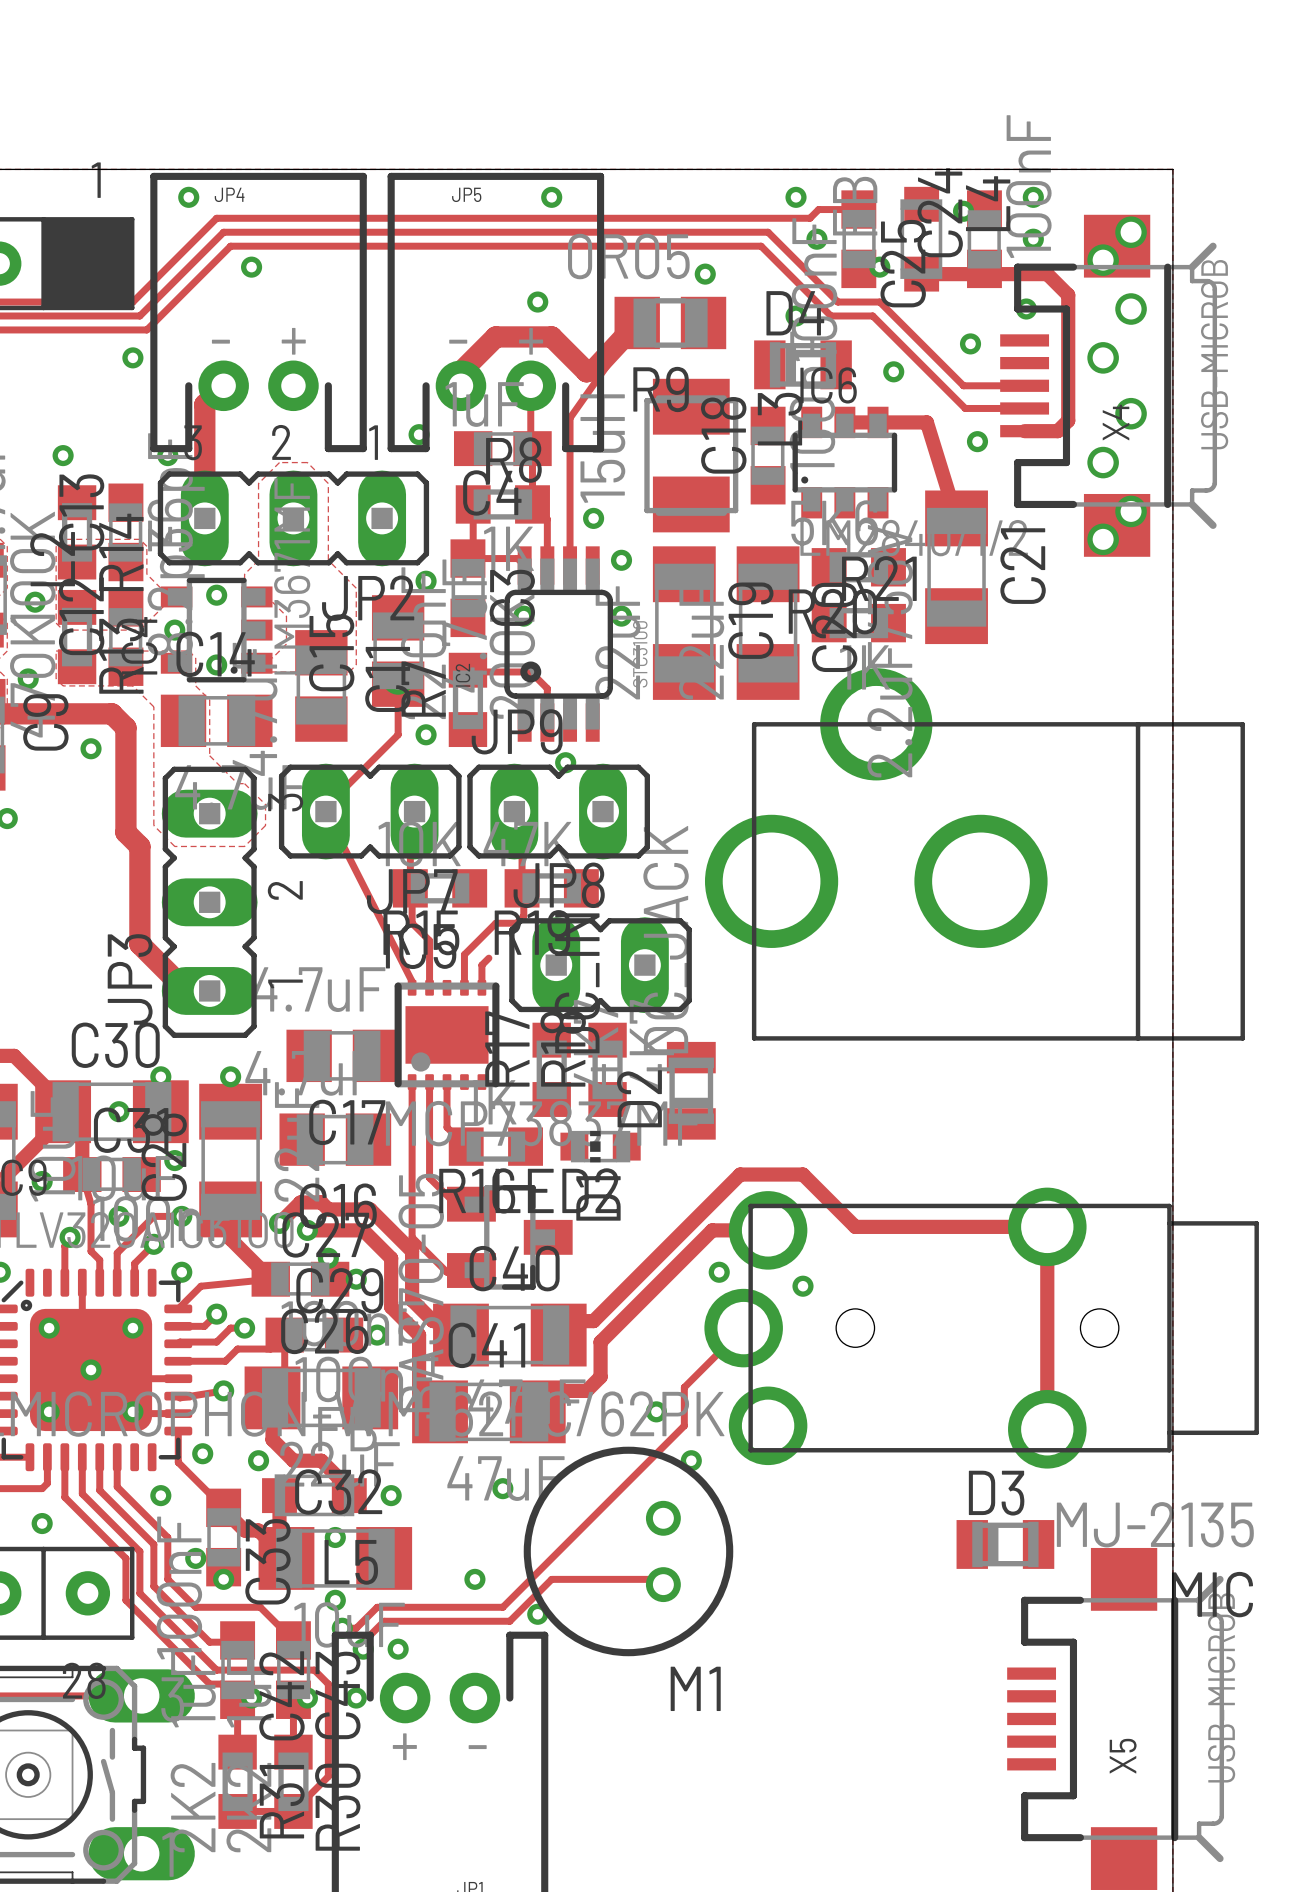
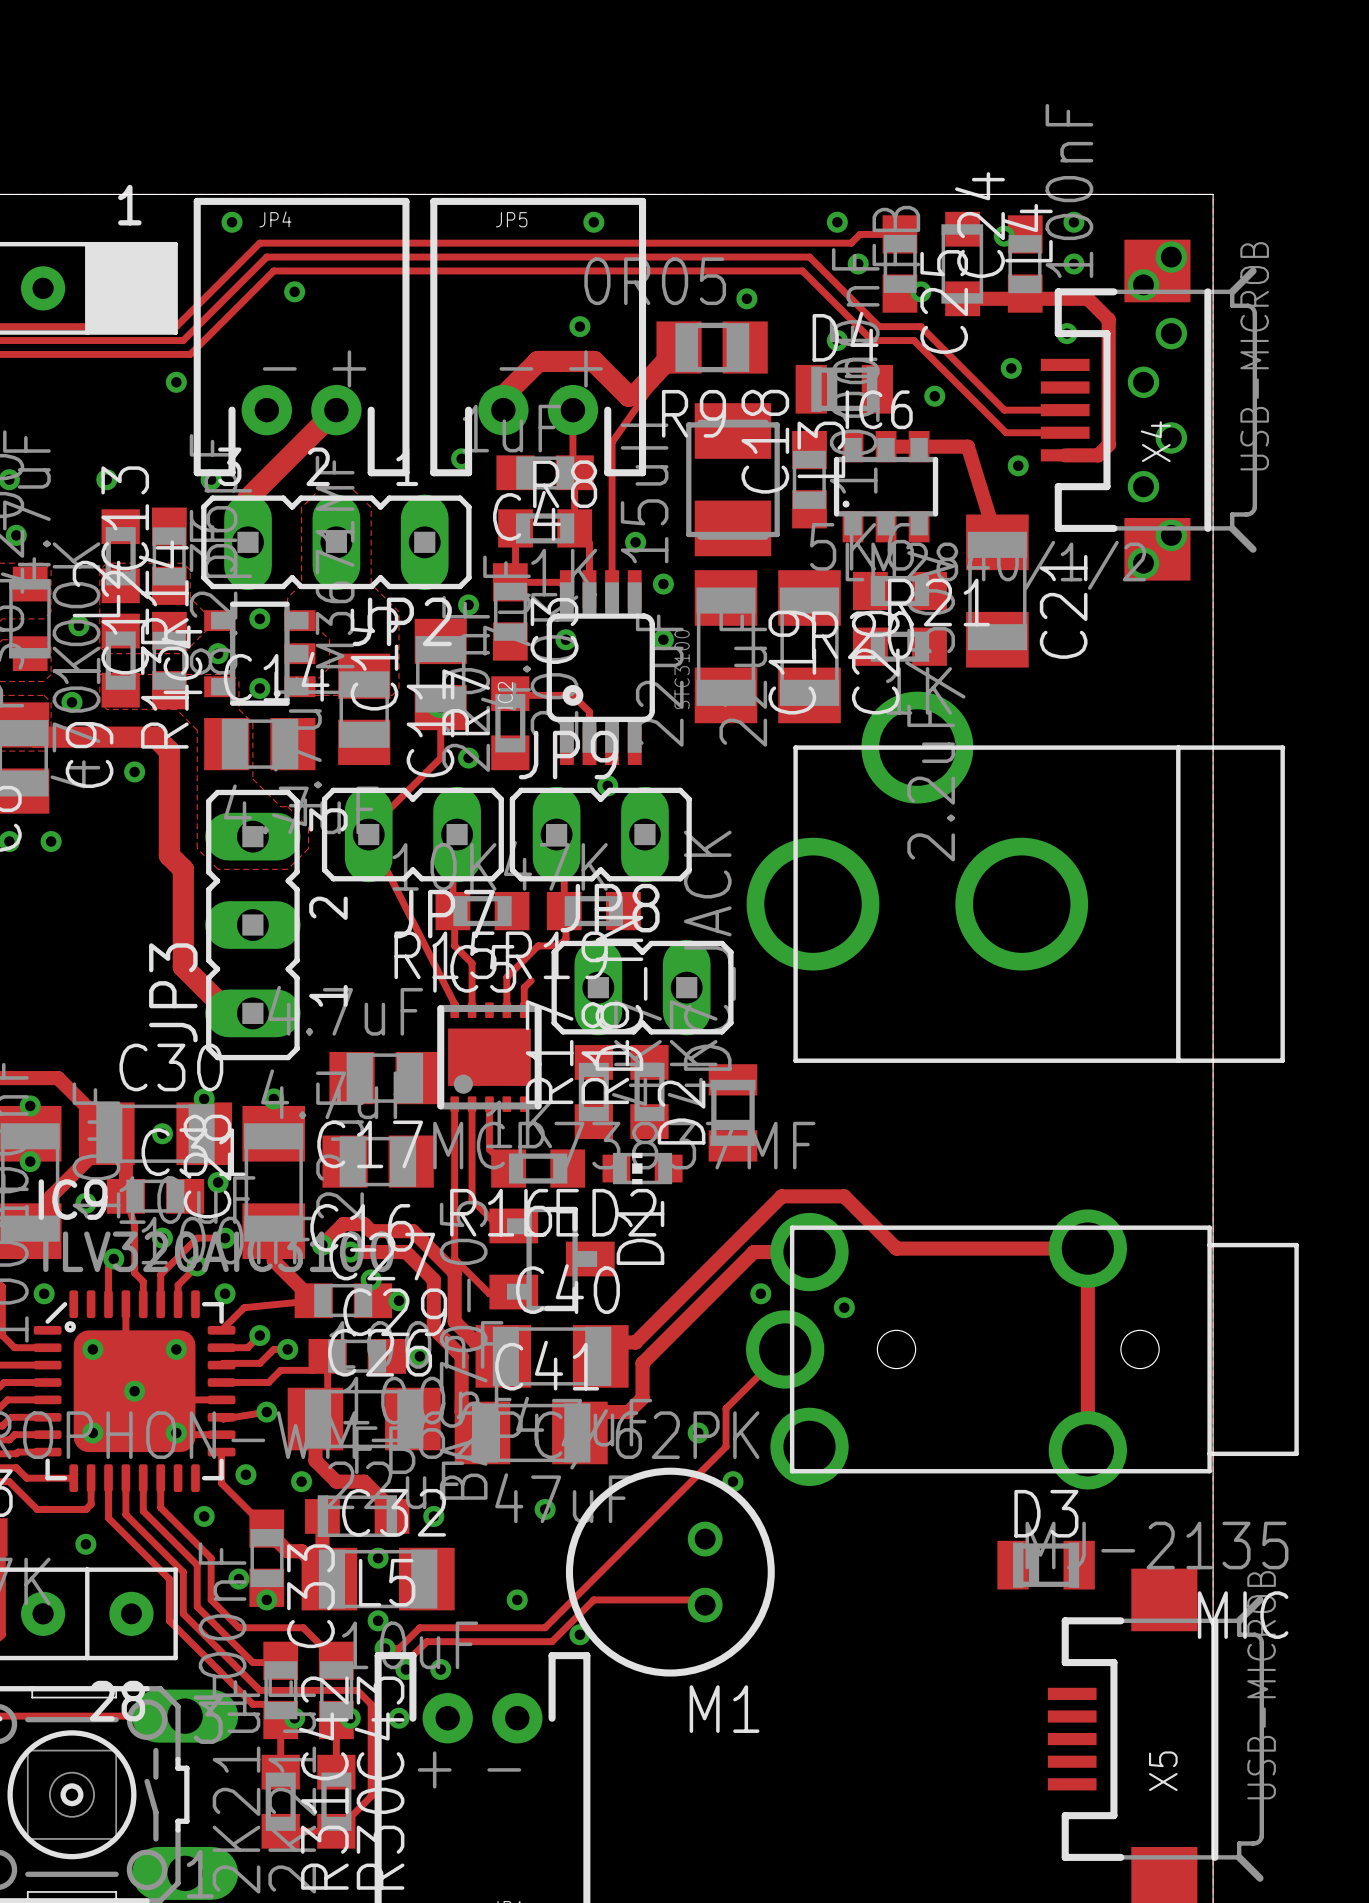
track: (223, 385) (204, 404) (204, 474) -> (336, 410) (248, 498)

